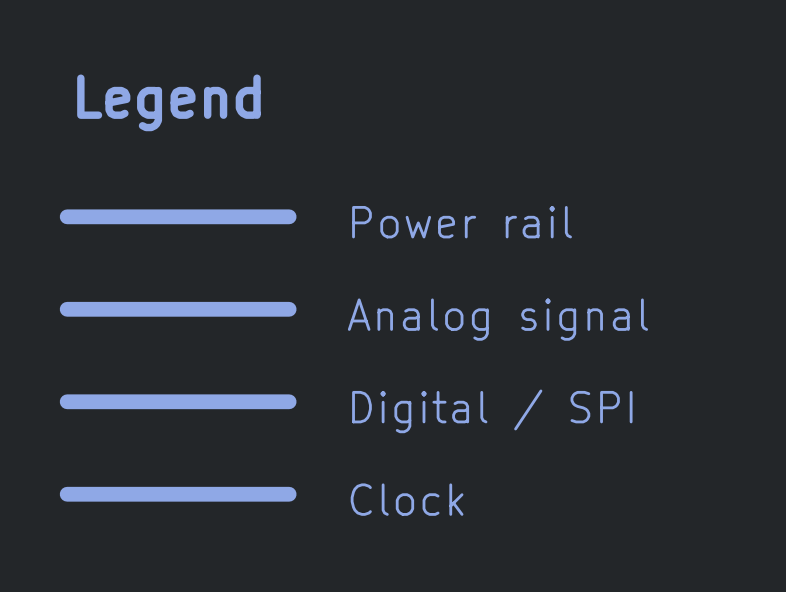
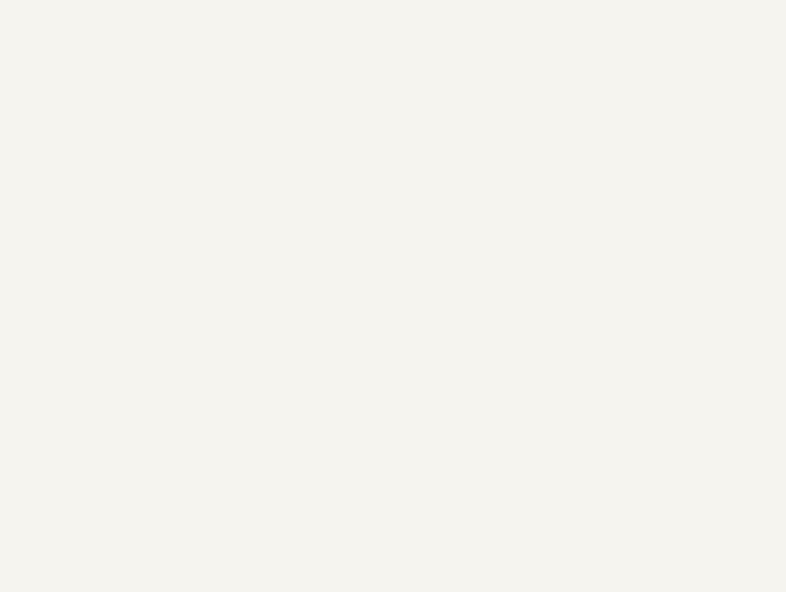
text: Legend (168, 102) -> none
line: (67, 216) (289, 216) -> none
text: Power rail (462, 222) -> none
line: (67, 309) (289, 309) -> none
text: Analog signal (497, 319) -> none
line: (67, 401) (289, 401) -> none
text: Digital / SPI (492, 411) -> none
line: (67, 494) (289, 494) -> none
text: Clock (407, 499) -> none

